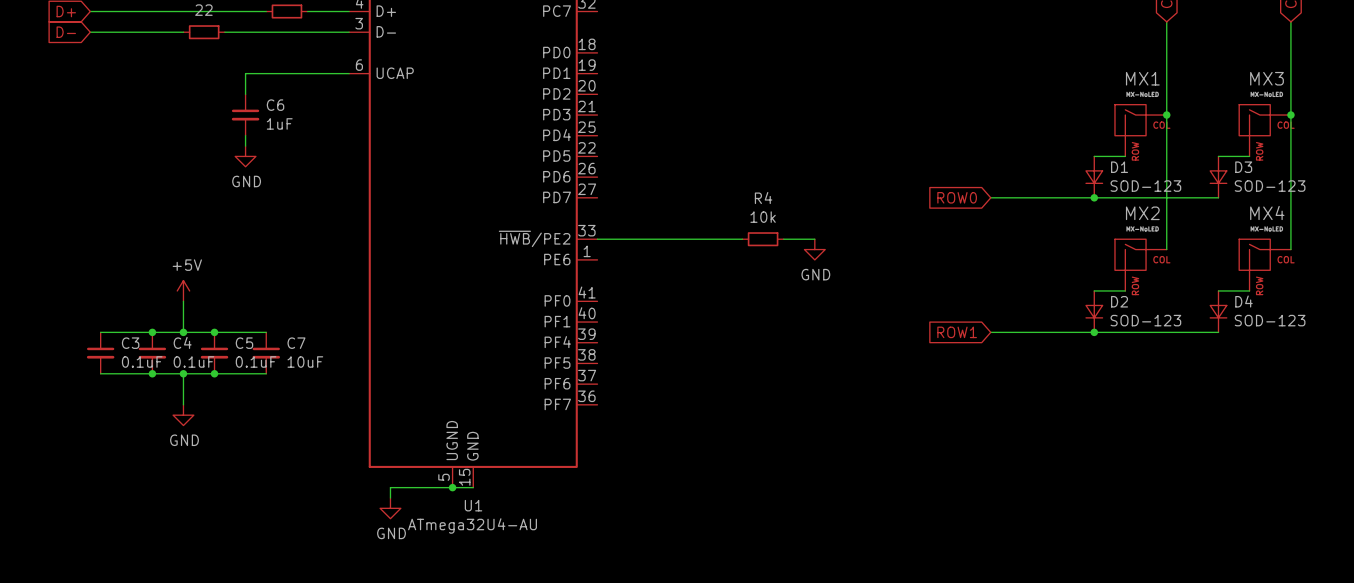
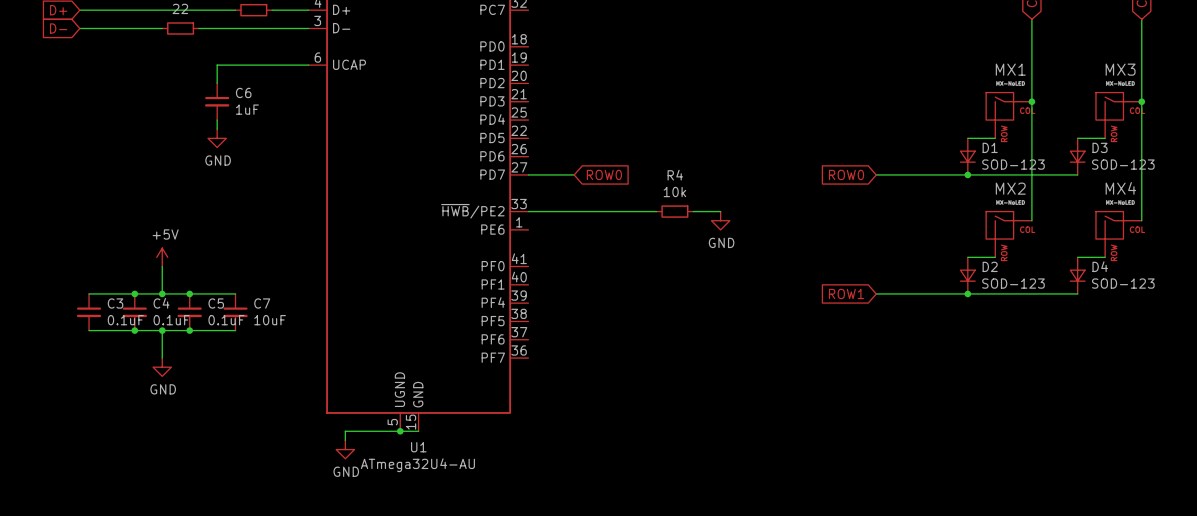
wire: none -> (528, 174) (574, 174)
global label: none -> ROW0 (604, 174)

